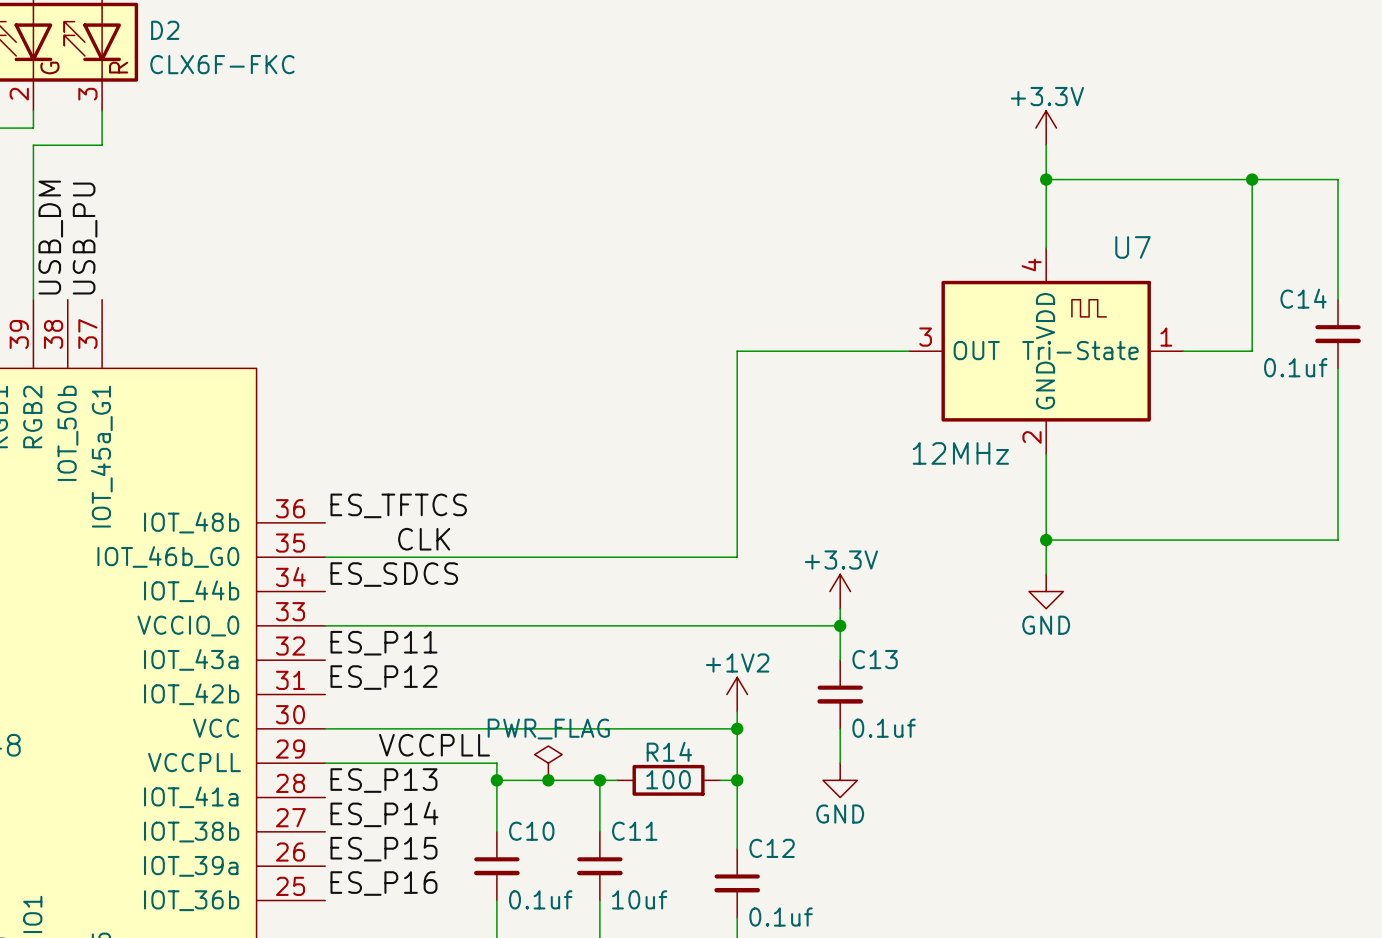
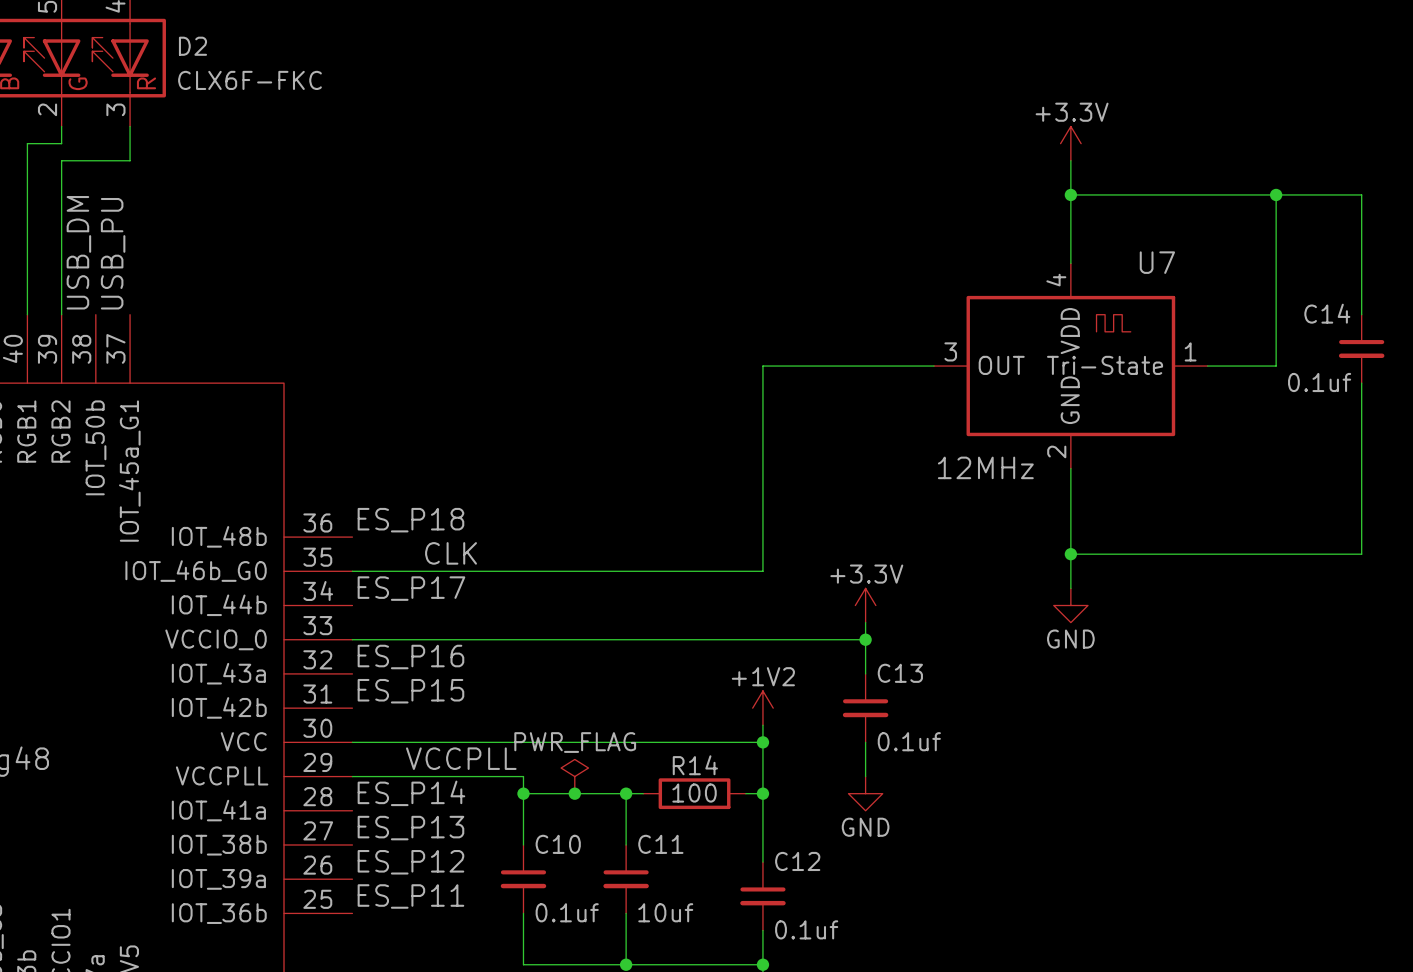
label: ES_TFTCS (398, 505) -> ES_P18 (410, 520)
label: ES_SDCS (394, 574) -> ES_P17 (411, 588)
label: ES_P11 (383, 643) -> ES_P16 (410, 657)
label: ES_P12 (383, 677) -> ES_P15 (410, 691)
label: ES_P13 (383, 780) -> ES_P14 (411, 793)
label: ES_P14 (384, 814) -> ES_P13 (410, 828)
label: ES_P15 (383, 849) -> ES_P12 (410, 862)
label: ES_P16 (383, 883) -> ES_P11 (410, 896)

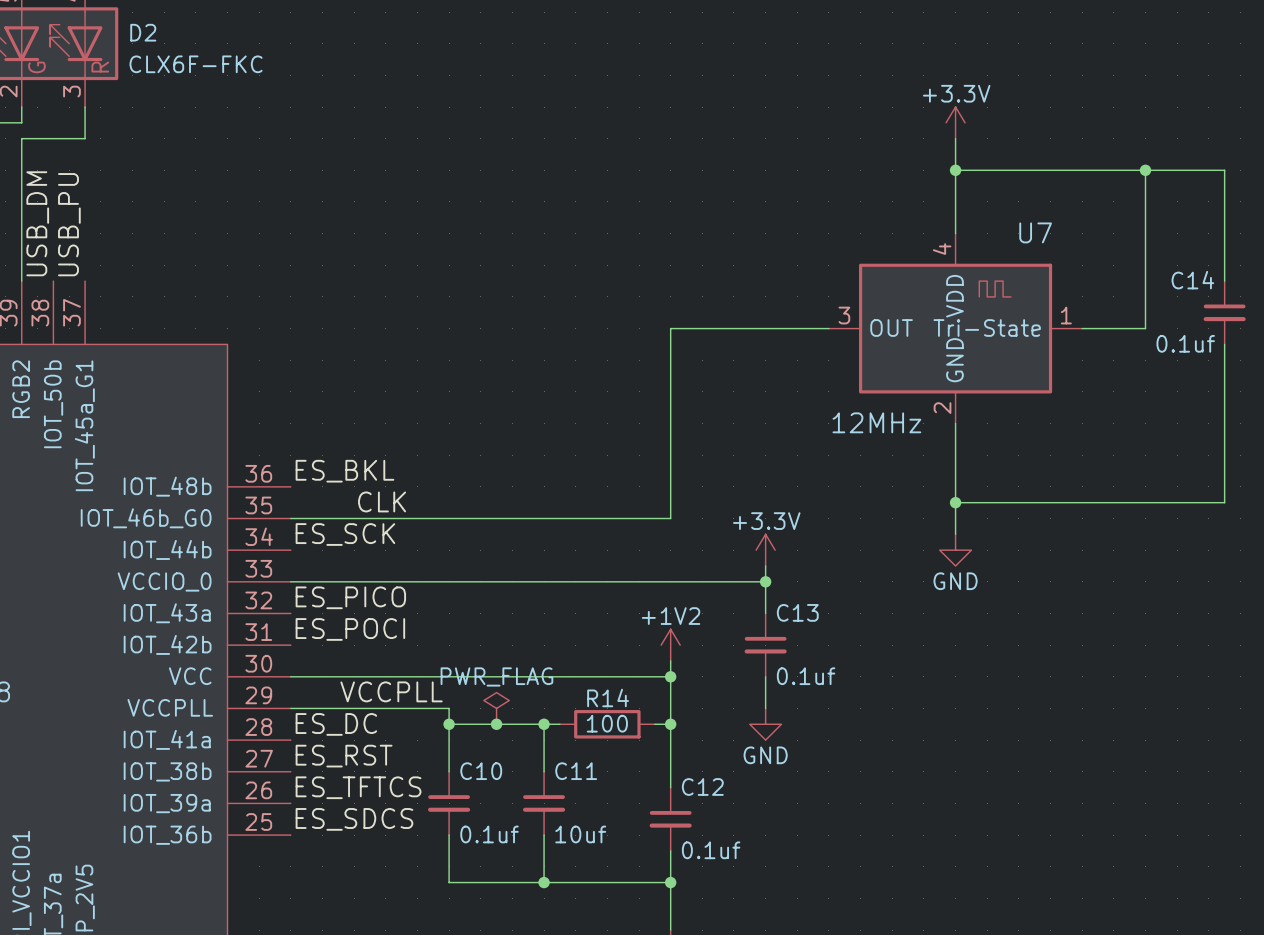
label: ES_P18 (410, 520) -> ES_BKL (344, 471)
label: ES_P17 (411, 588) -> ES_SCK (345, 534)
label: ES_P16 (410, 657) -> ES_PICO (350, 597)
label: ES_P15 (410, 691) -> ES_POCI (350, 629)
label: ES_P14 (411, 793) -> ES_DC (336, 724)
label: ES_P13 (410, 828) -> ES_RST (344, 756)
label: ES_P12 (410, 862) -> ES_TFTCS (358, 787)
label: ES_P11 (410, 896) -> ES_SDCS (354, 819)

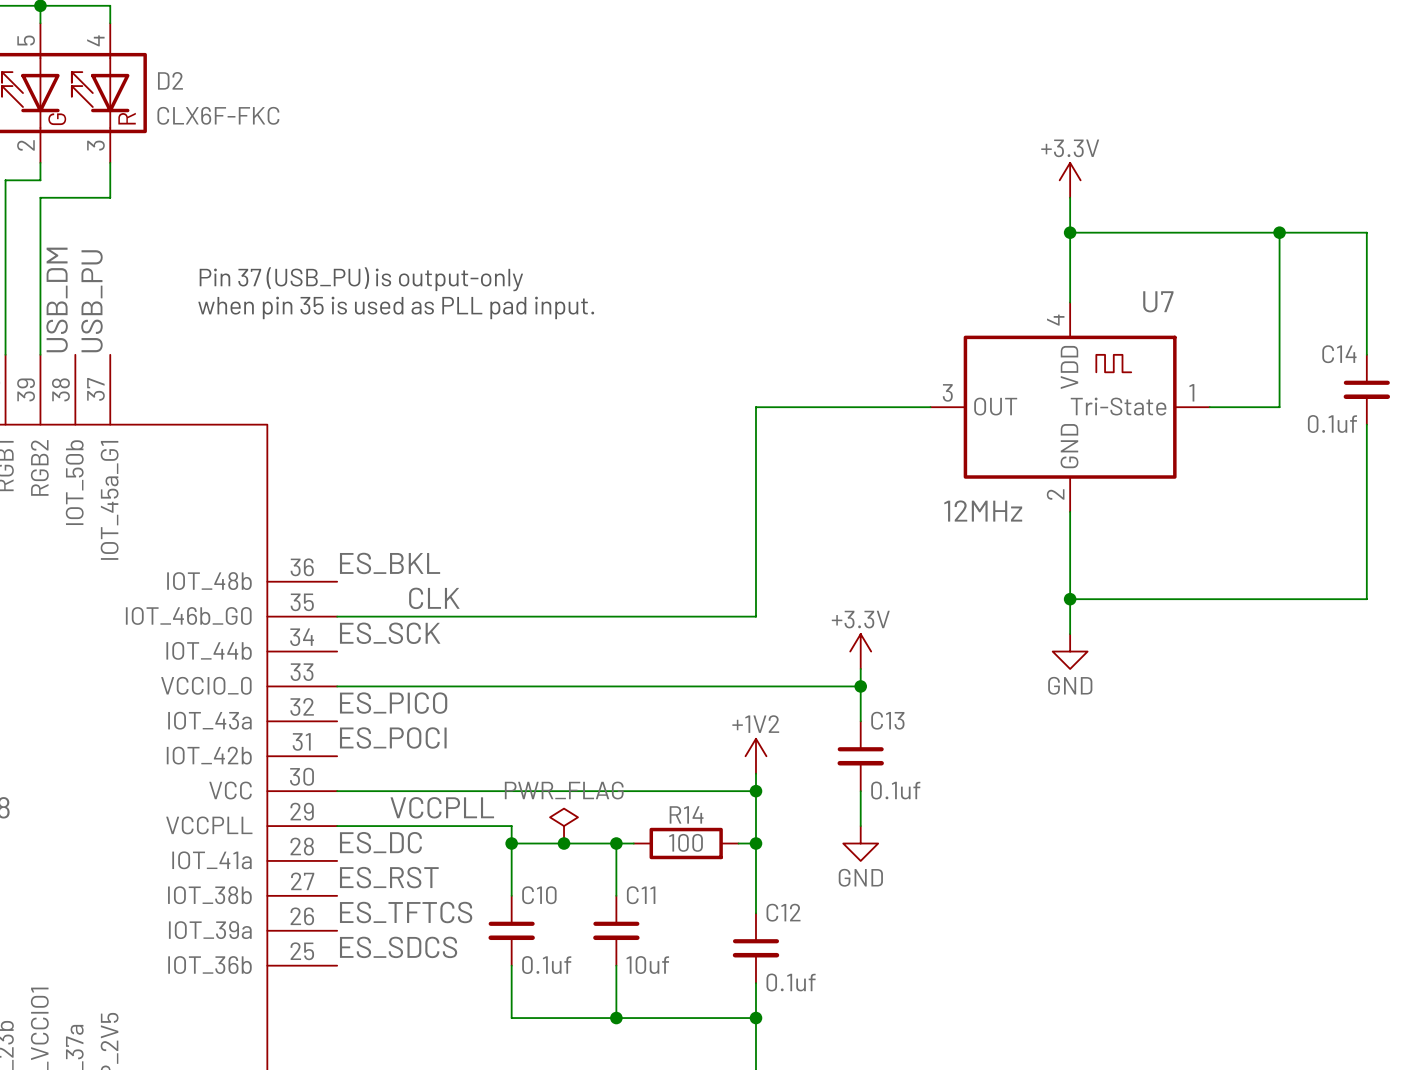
text: none -> Pin 37 (USB_PU) is output-only (361, 279)
text: none -> when pin 35 is used as PLL pad input. (396, 307)

